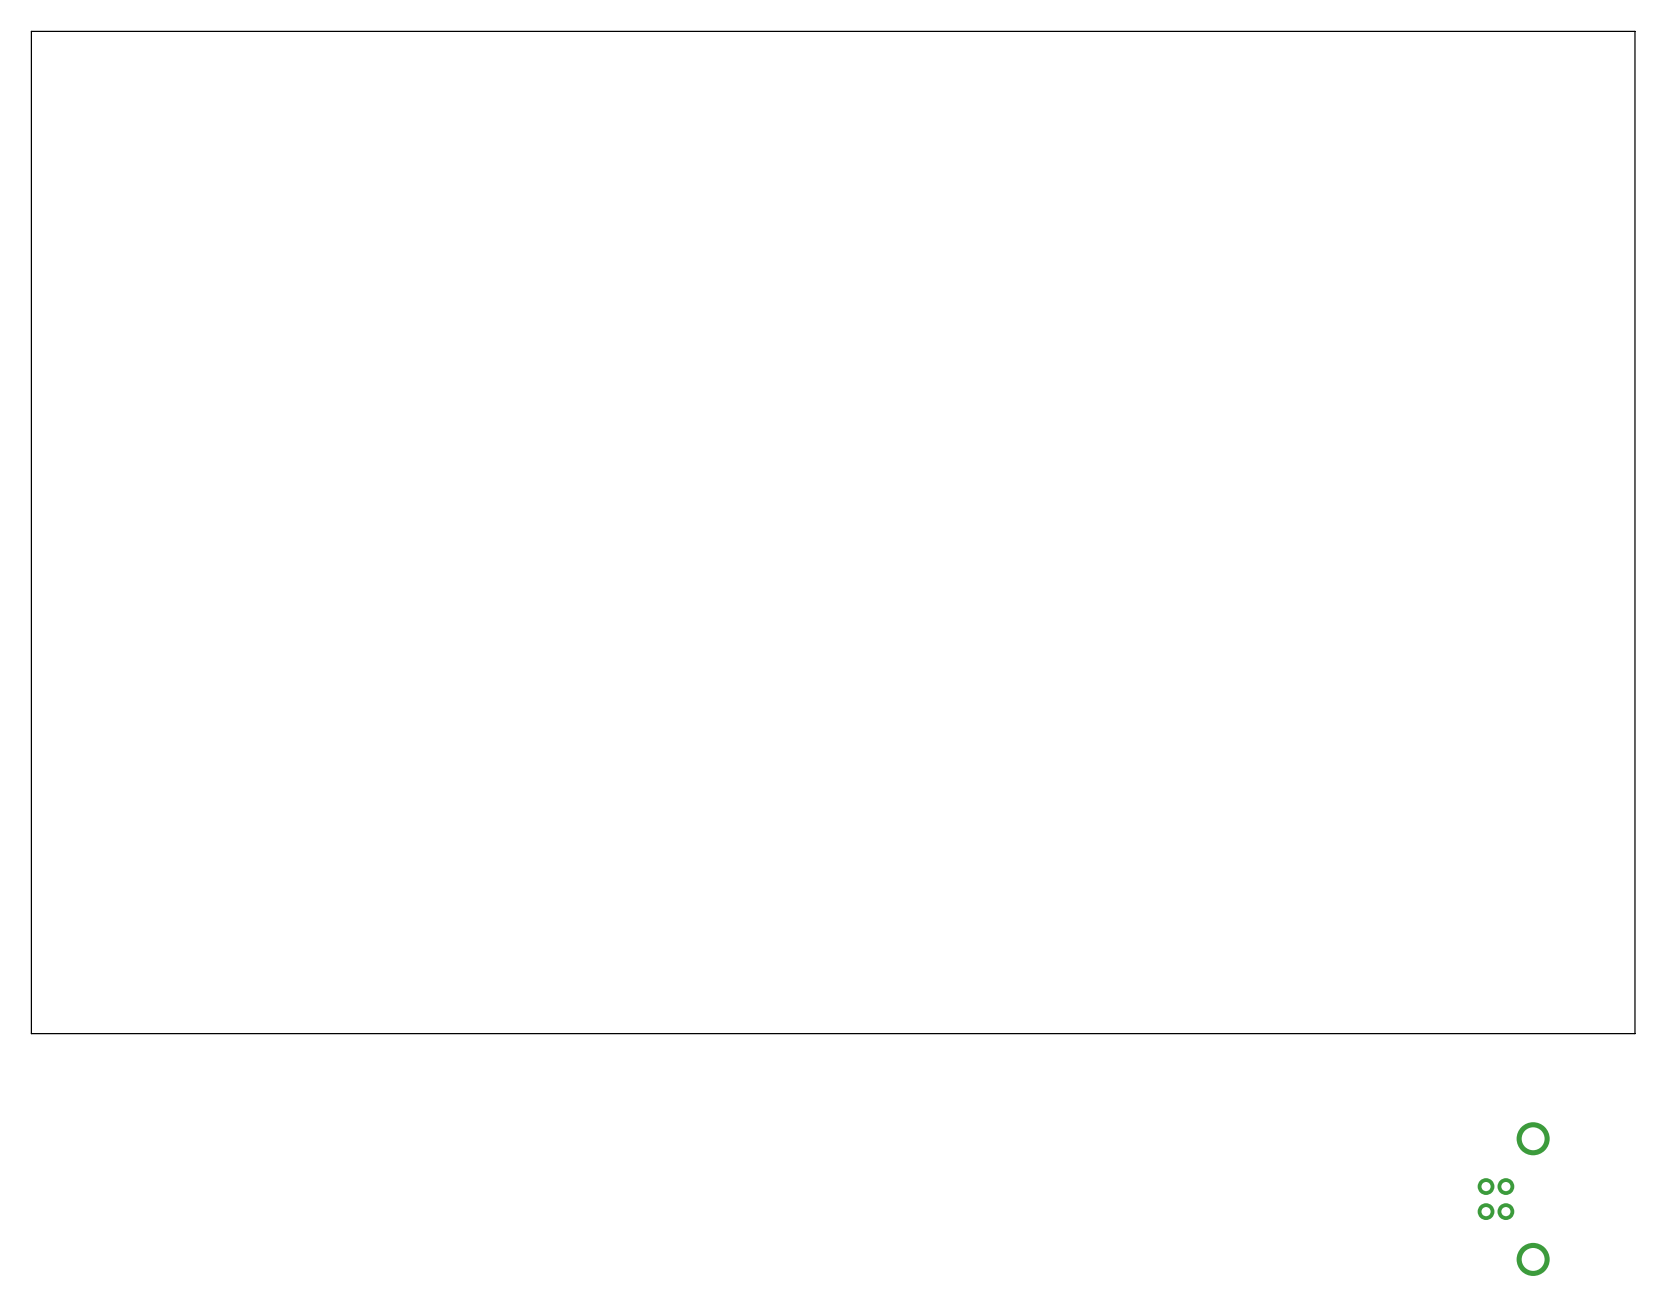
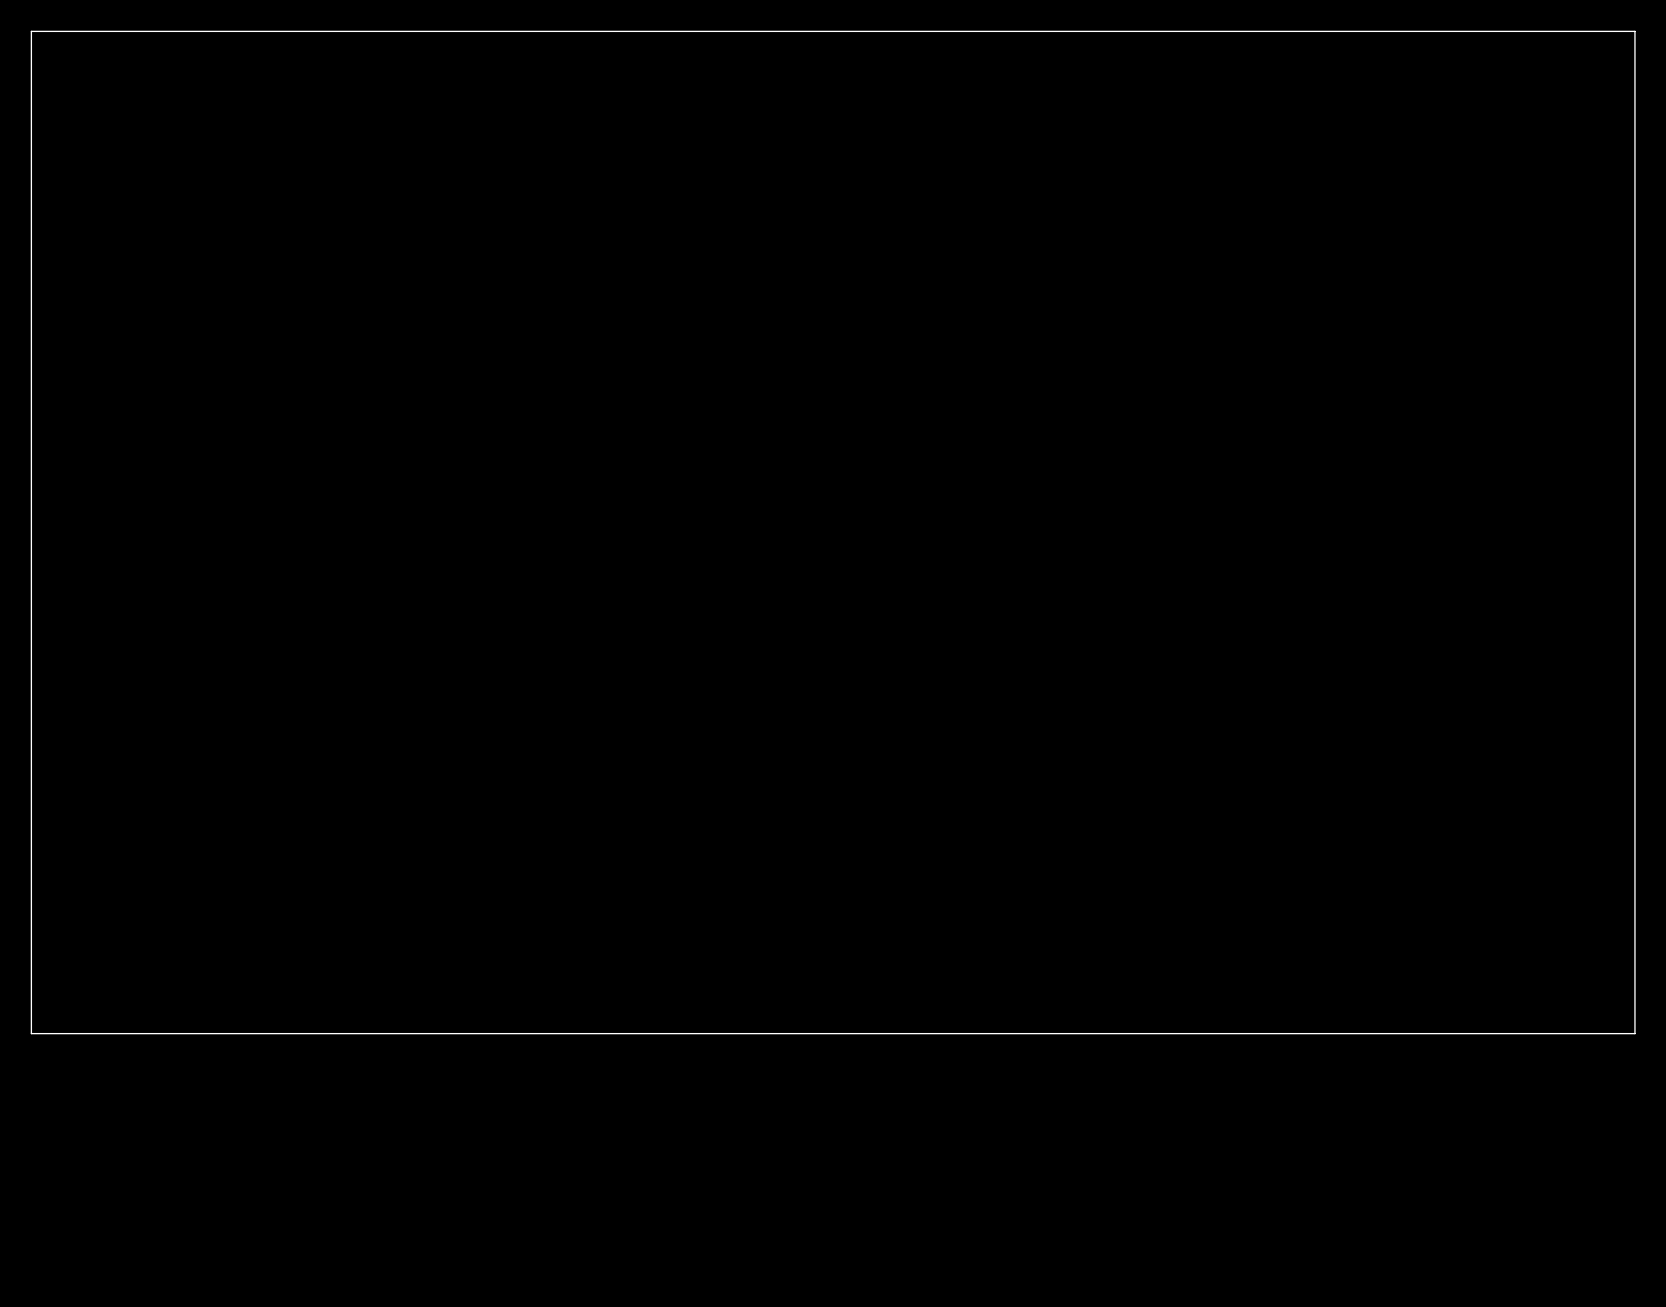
part: (1513, 1199) -> none

